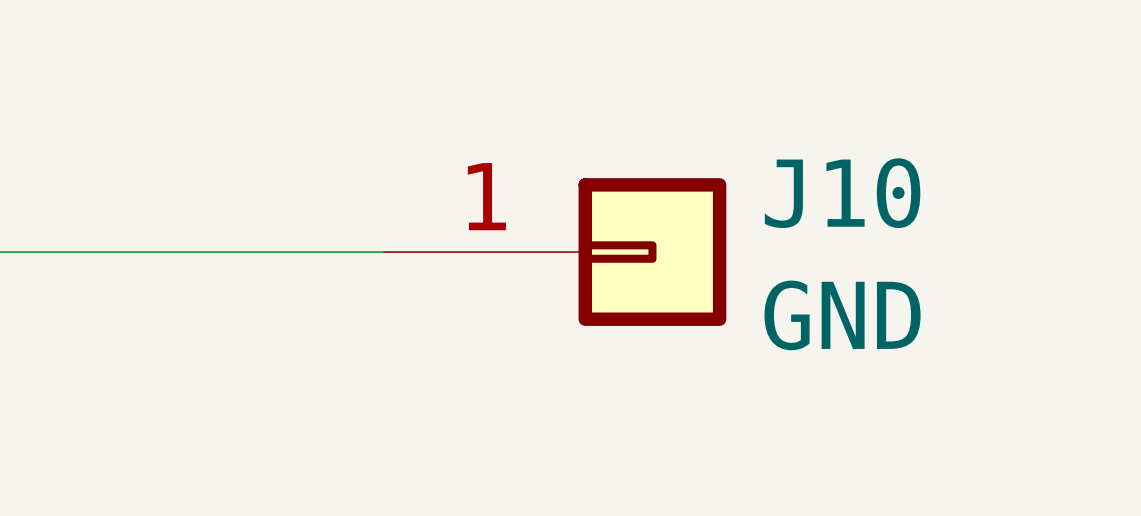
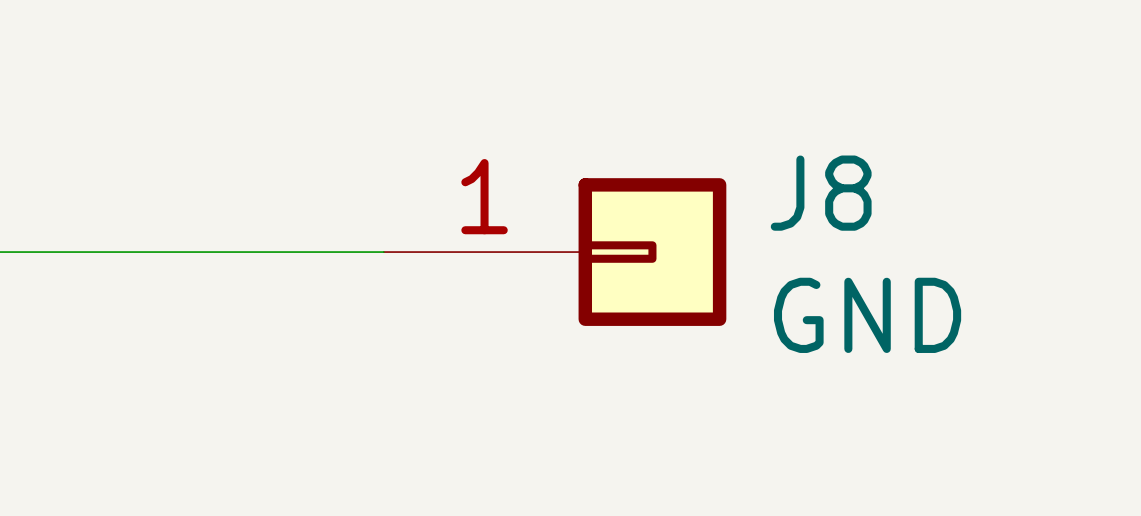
J10 name: J10 (842, 193) -> J8 (821, 193)

